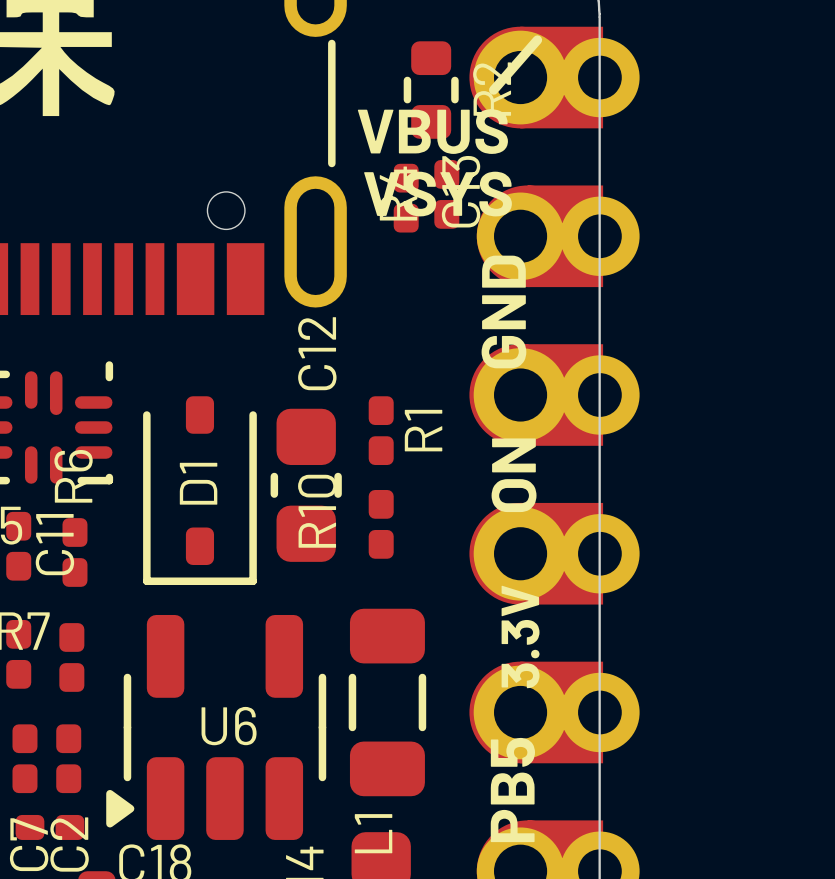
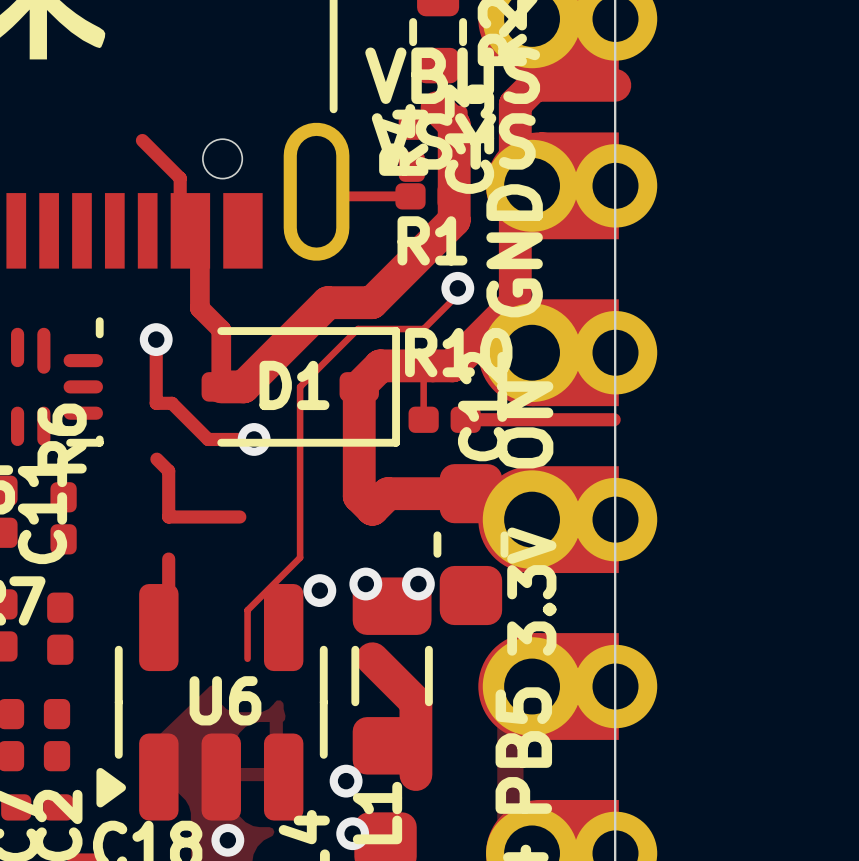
track: none -> (614, 85) (534, 85) (515, 104) (515, 303) (452, 365) (380, 365) (359, 386) (359, 496) (372, 509) (387, 493) (470, 493)
track: none -> (437, 107) (454, 124) (454, 220) (371, 302) (327, 302) (243, 386) (221, 386) (221, 329) (199, 308) (199, 236)
track: none -> (142, 140) (180, 178) (180, 236)
track: none -> (340, 196) (399, 196)
via: none -> (457, 288)
track: none -> (457, 294) (423, 329) (357, 329) (300, 386) (300, 557) (247, 610) (247, 658)
via: none -> (156, 339)
track: none -> (156, 341) (156, 403) (171, 403) (208, 439) (254, 439)
track: none -> (424, 365) (423, 419)
R1 rotation: 0° (381, 430) -> 90° clockwise (431, 196)
R1 position: (381, 430) -> (431, 196)
track: none -> (476, 419) (614, 419)
via: none -> (254, 439)
C12 position: (306, 485) -> (470, 544)
D1 rotation: 0° (199, 490) -> 90° counterclockwise (300, 386)
D1 position: (199, 490) -> (300, 386)
track: none -> (156, 459) (168, 471) (168, 516) (239, 516)
R10 rotation: 0° (381, 524) -> 90° clockwise (444, 419)
R10 position: (381, 524) -> (444, 419)
track: none -> (168, 559) (168, 610)
via: none -> (365, 584)
via: none -> (418, 584)
via: none -> (319, 590)
track: none -> (372, 658) (415, 702) (415, 774)
via: none -> (346, 781)
via: none -> (352, 833)
via: none -> (227, 840)

